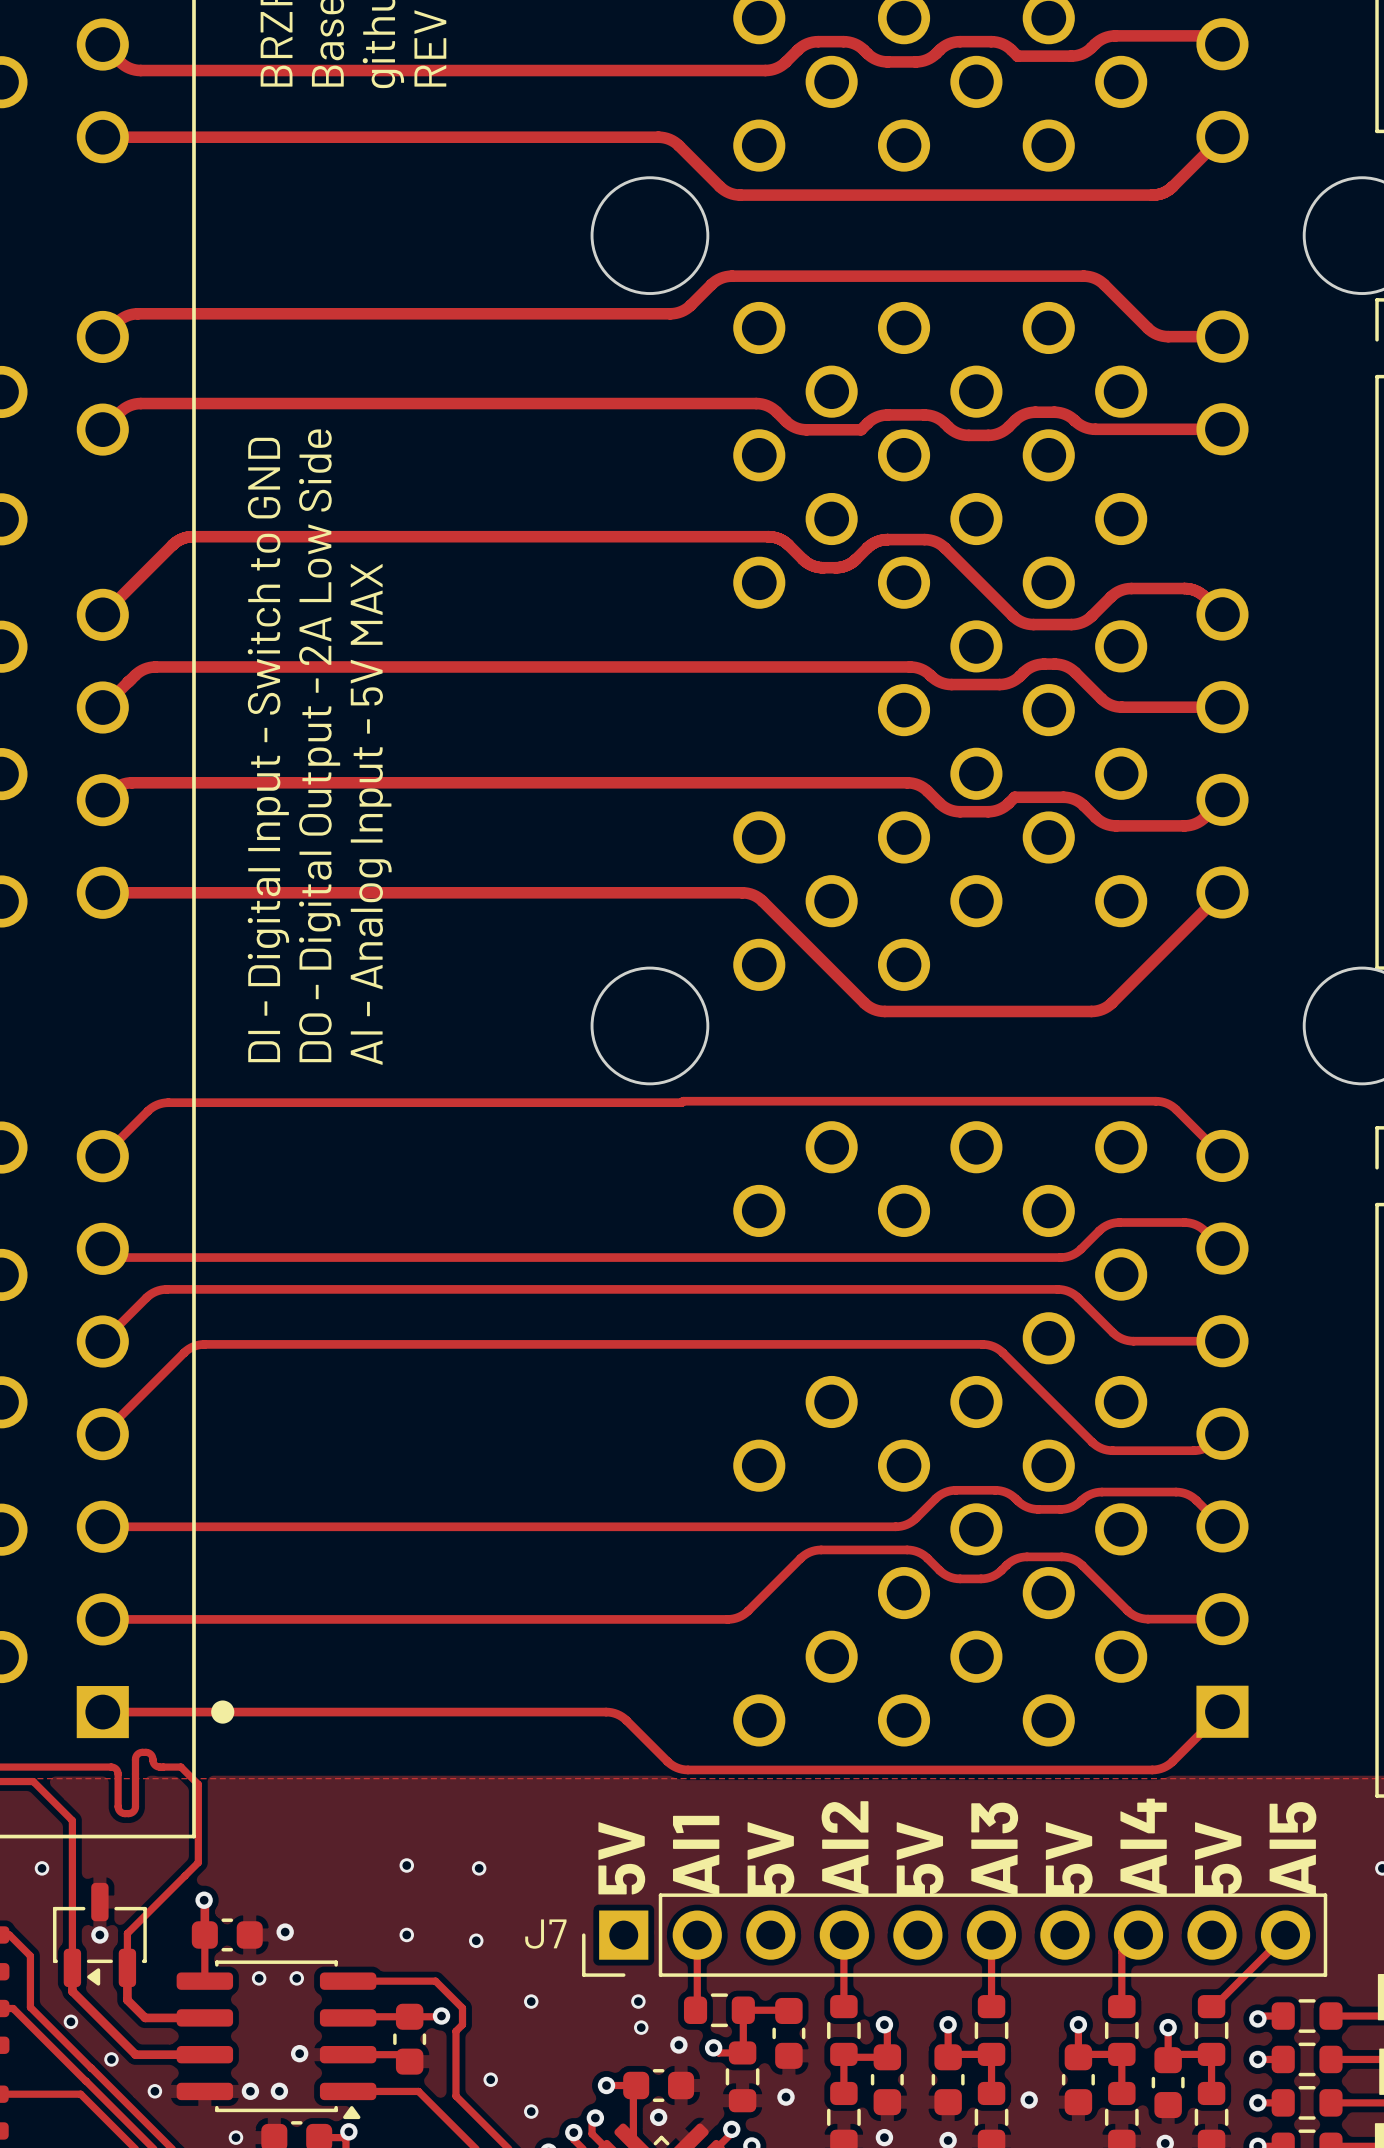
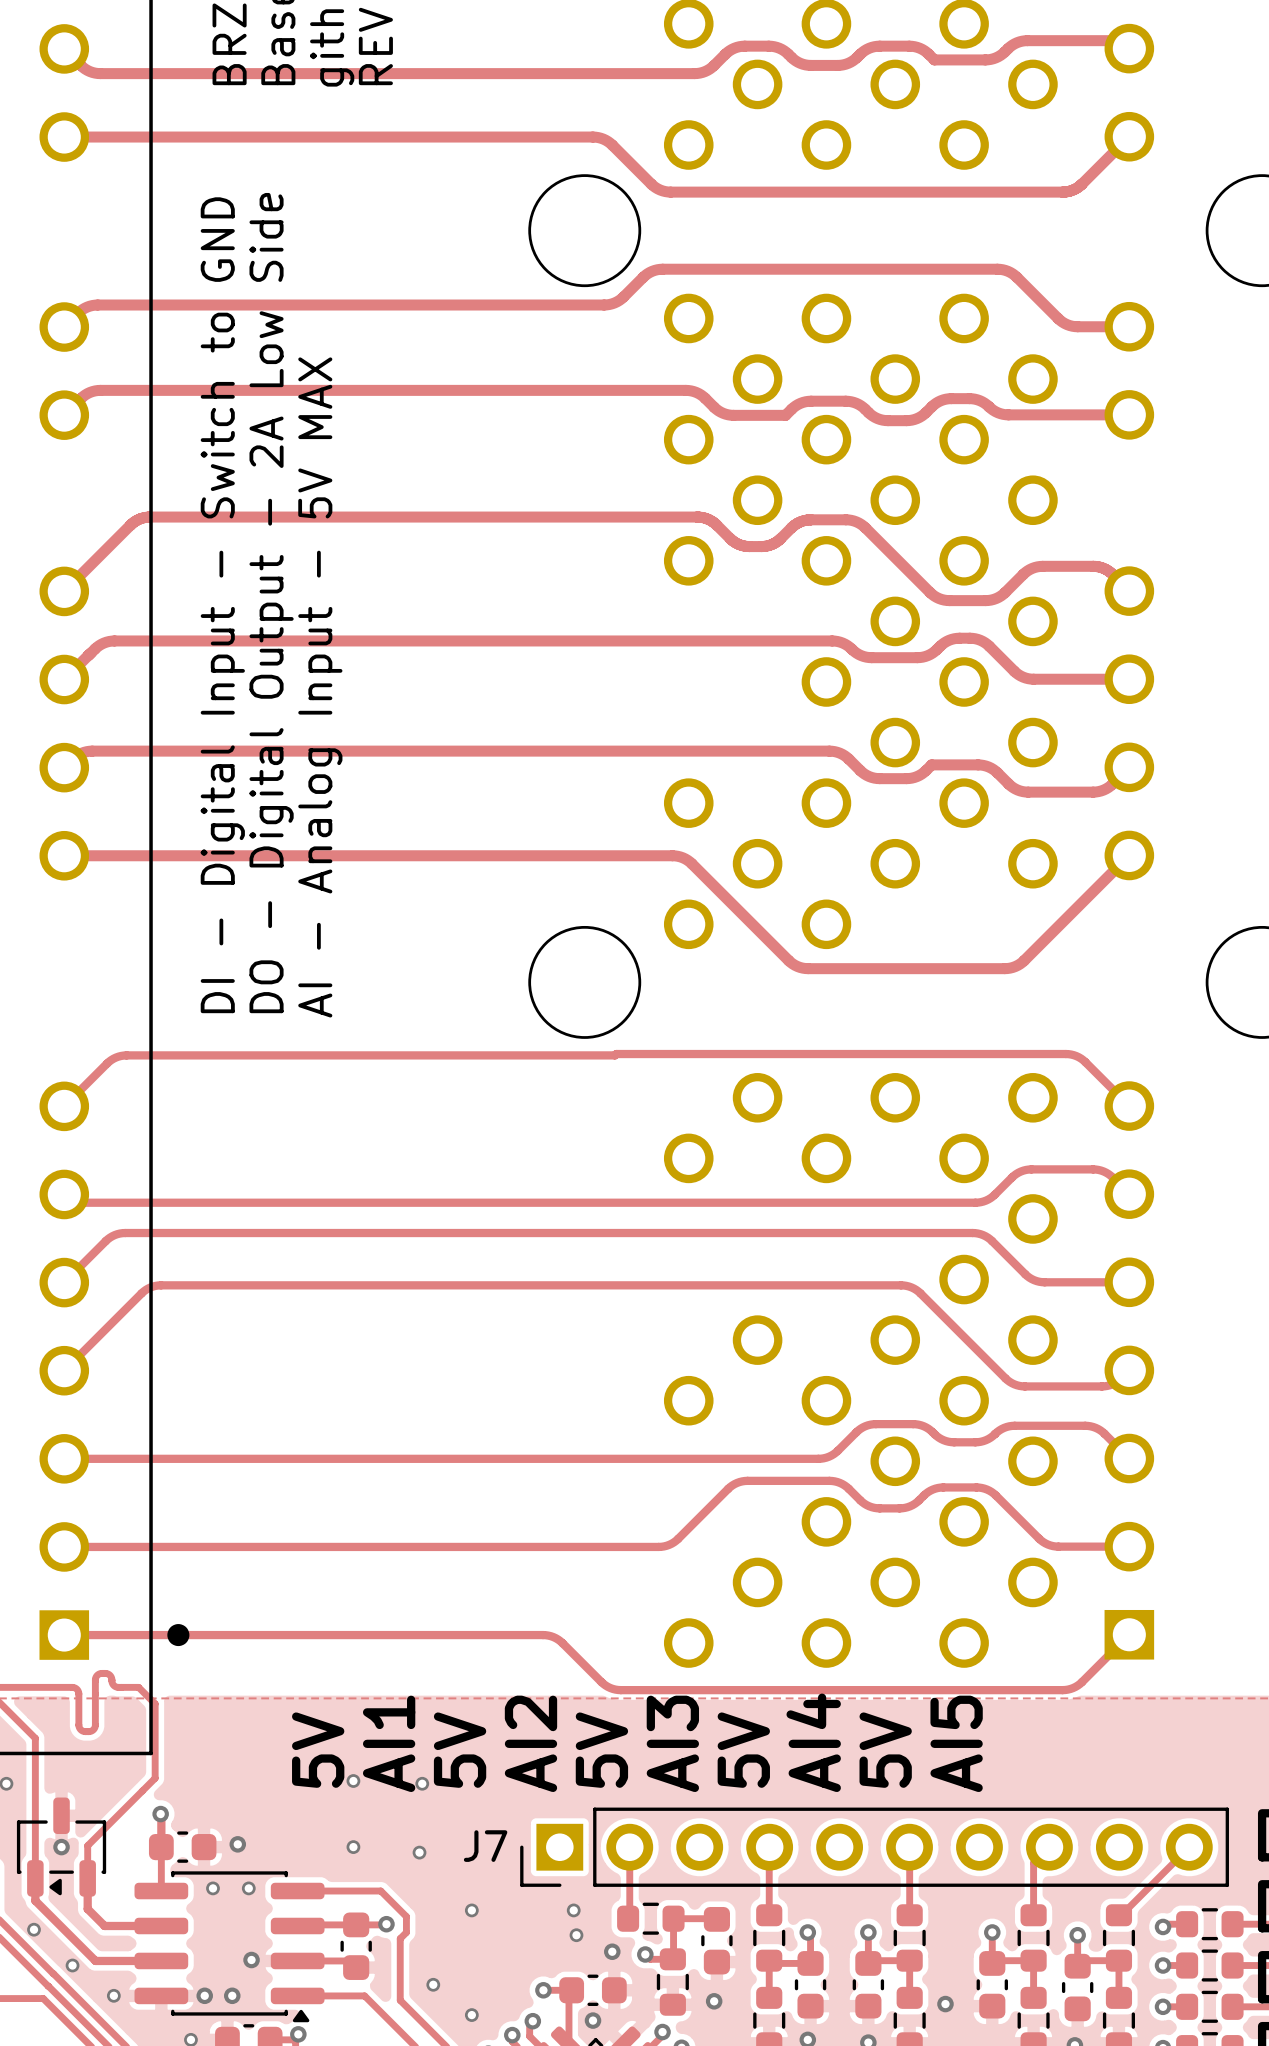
text: none -> 5V (318, 1750)
text: none -> 5V (460, 1750)
text position: AI4 (1143, 1847) -> AI4 (813, 1742)
text position: AI2 (845, 1848) -> AI2 (530, 1743)
text position: AI5 (1292, 1848) -> AI5 (956, 1743)
text position: AI3 (994, 1849) -> AI3 (672, 1743)
text position: AI1 (696, 1855) -> AI1 (389, 1743)
text position: 5V (621, 1858) -> 5V (601, 1750)
text position: 5V (770, 1858) -> 5V (743, 1750)
text position: 5V (920, 1858) -> 5V (885, 1750)
text: 5V (1069, 1858) -> none
text: 5V (1218, 1858) -> none

